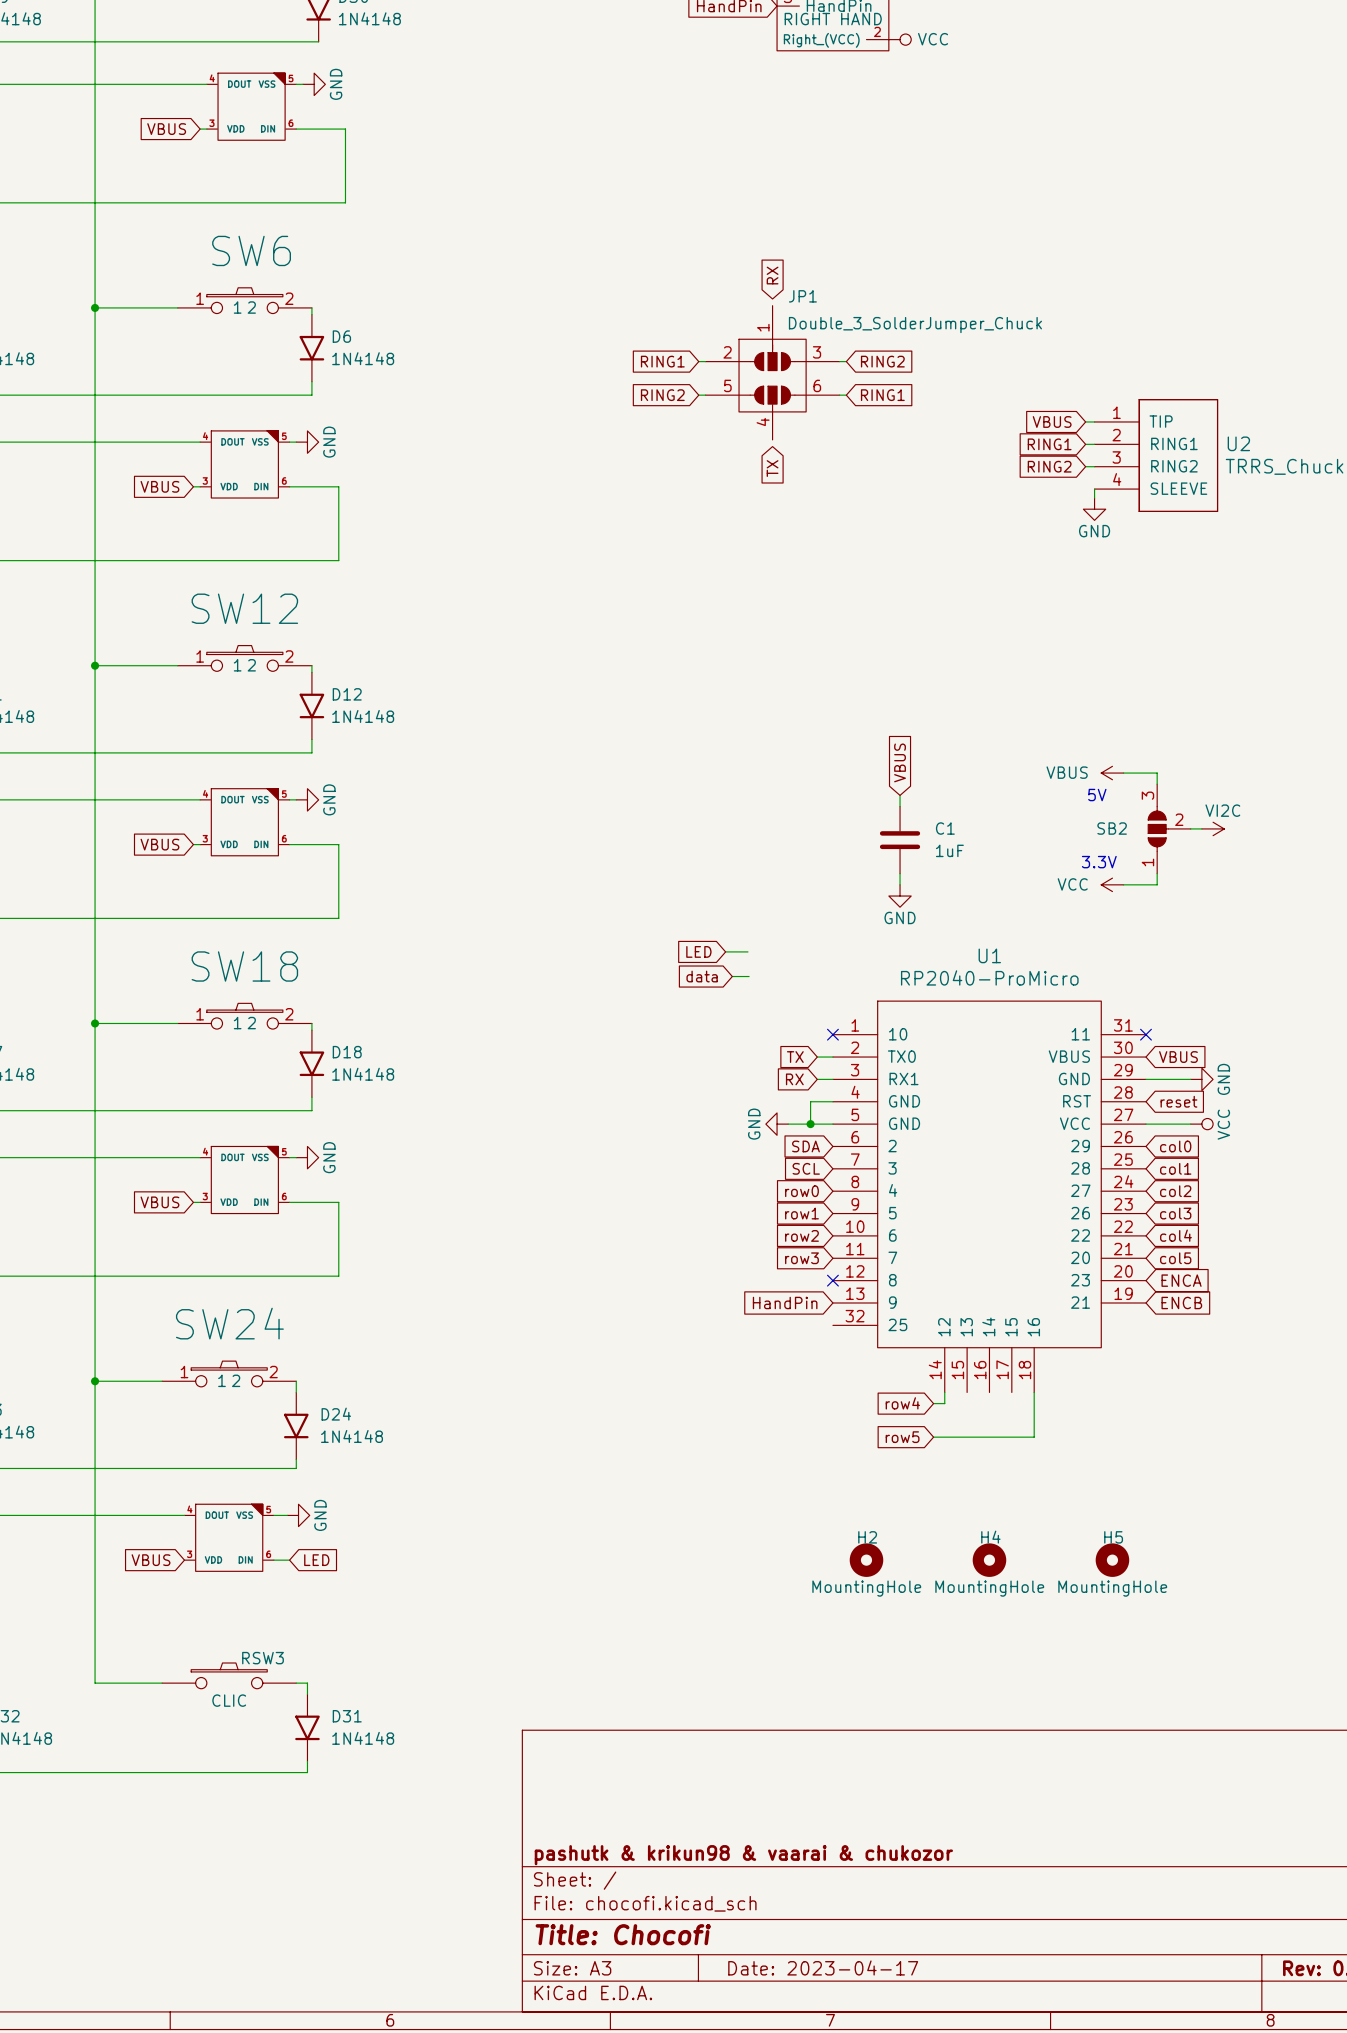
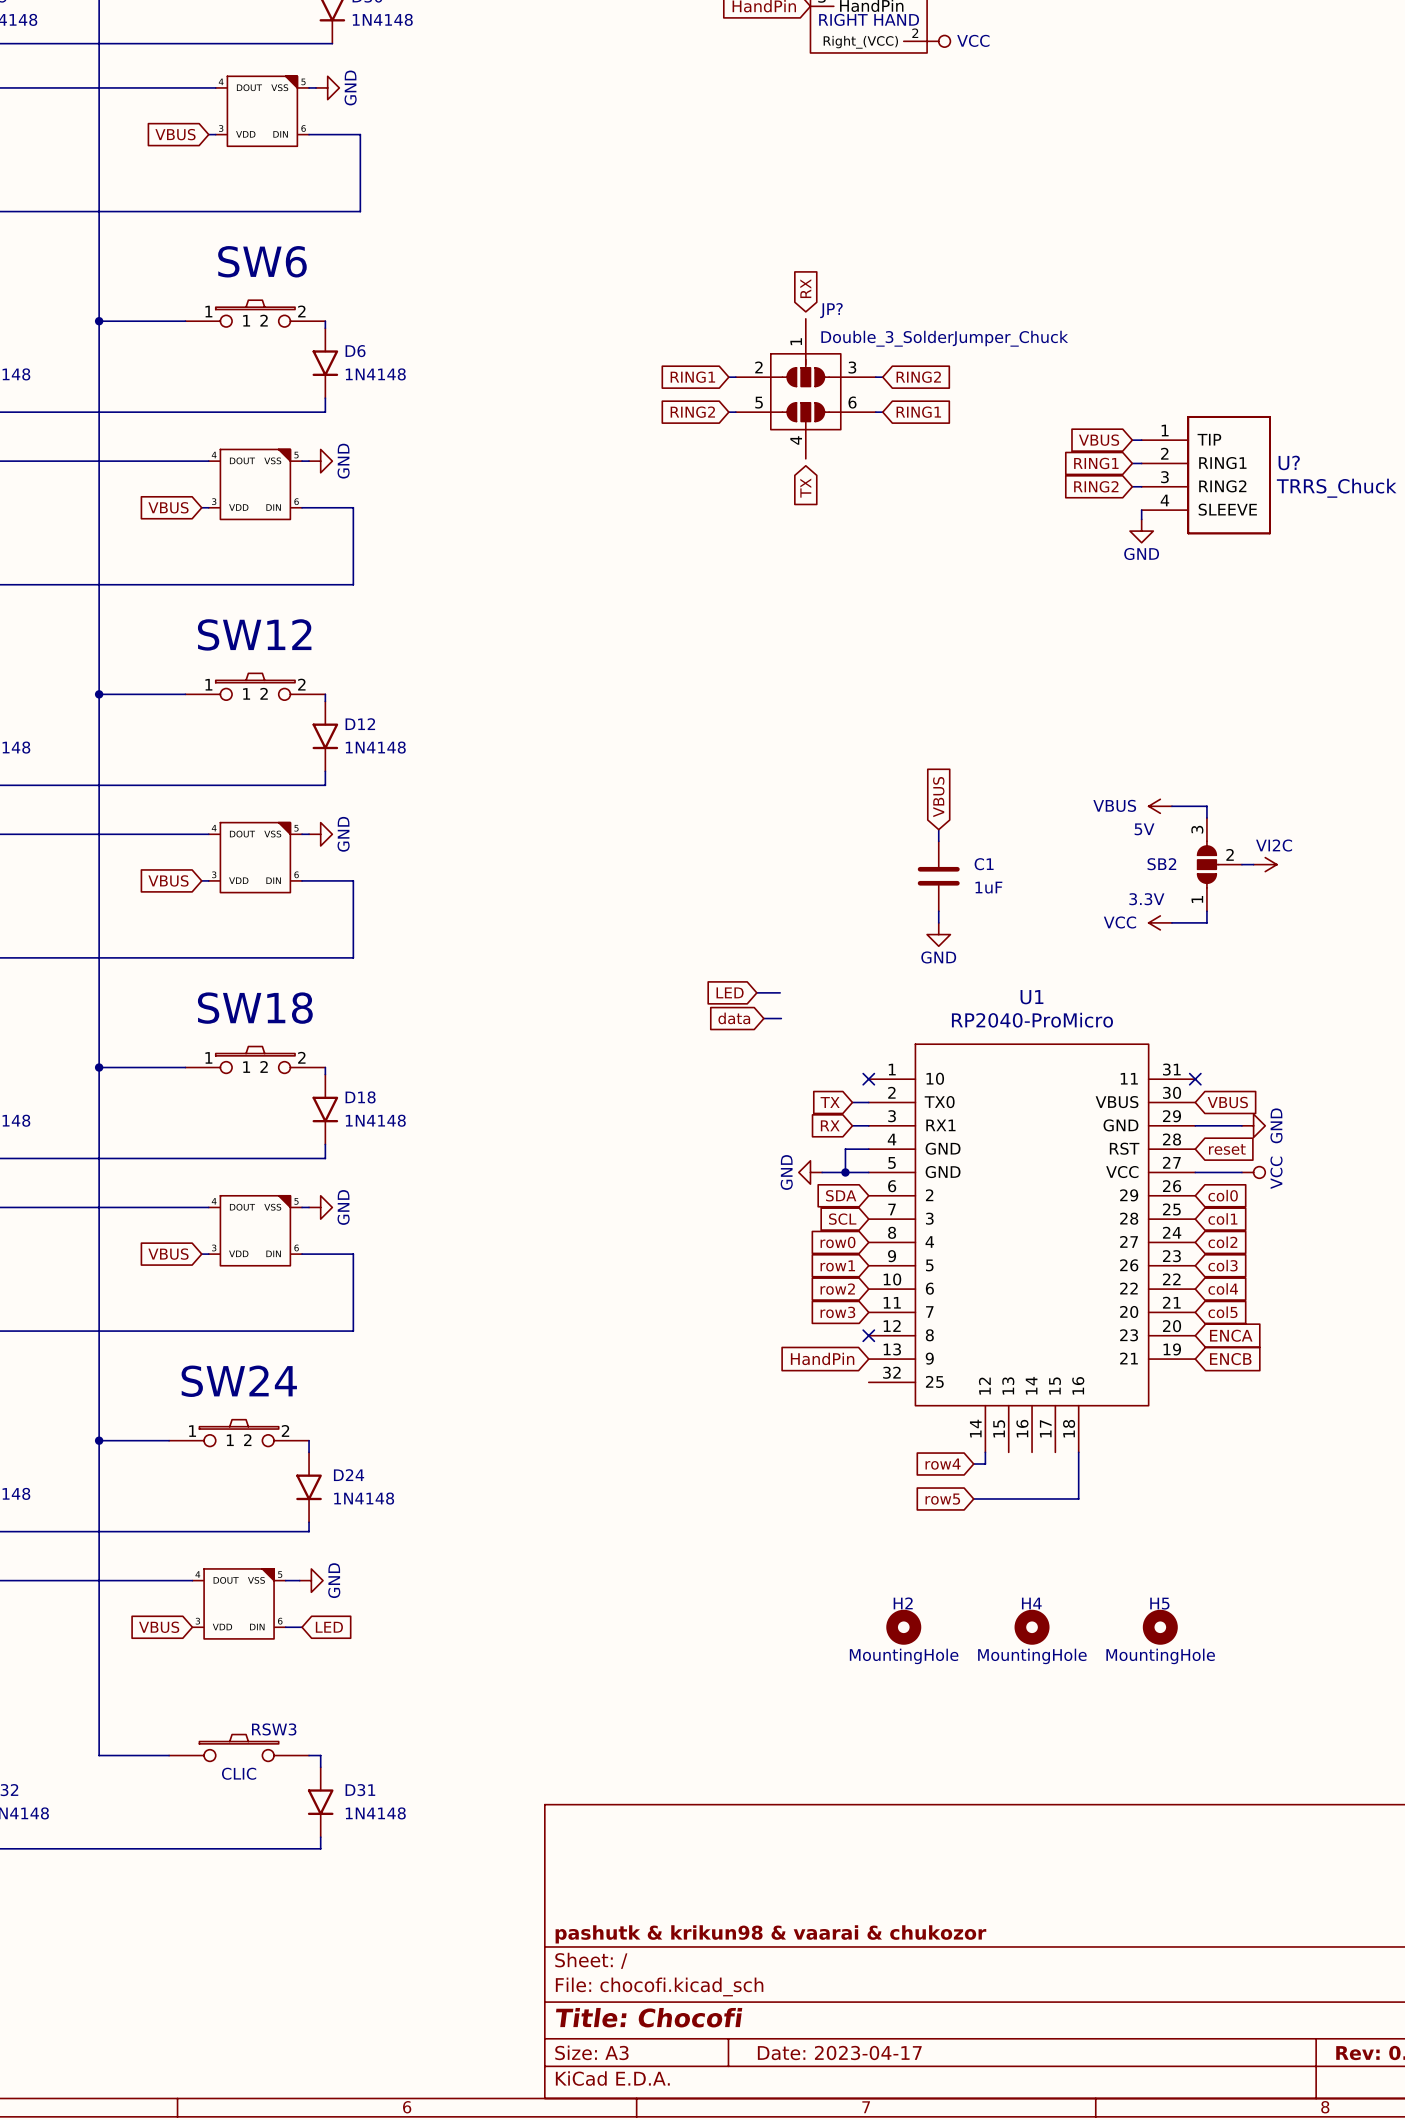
JP1 name: JP1 (802, 296) -> JP? (831, 310)
U2 name: U2 (1238, 443) -> U? (1289, 462)

